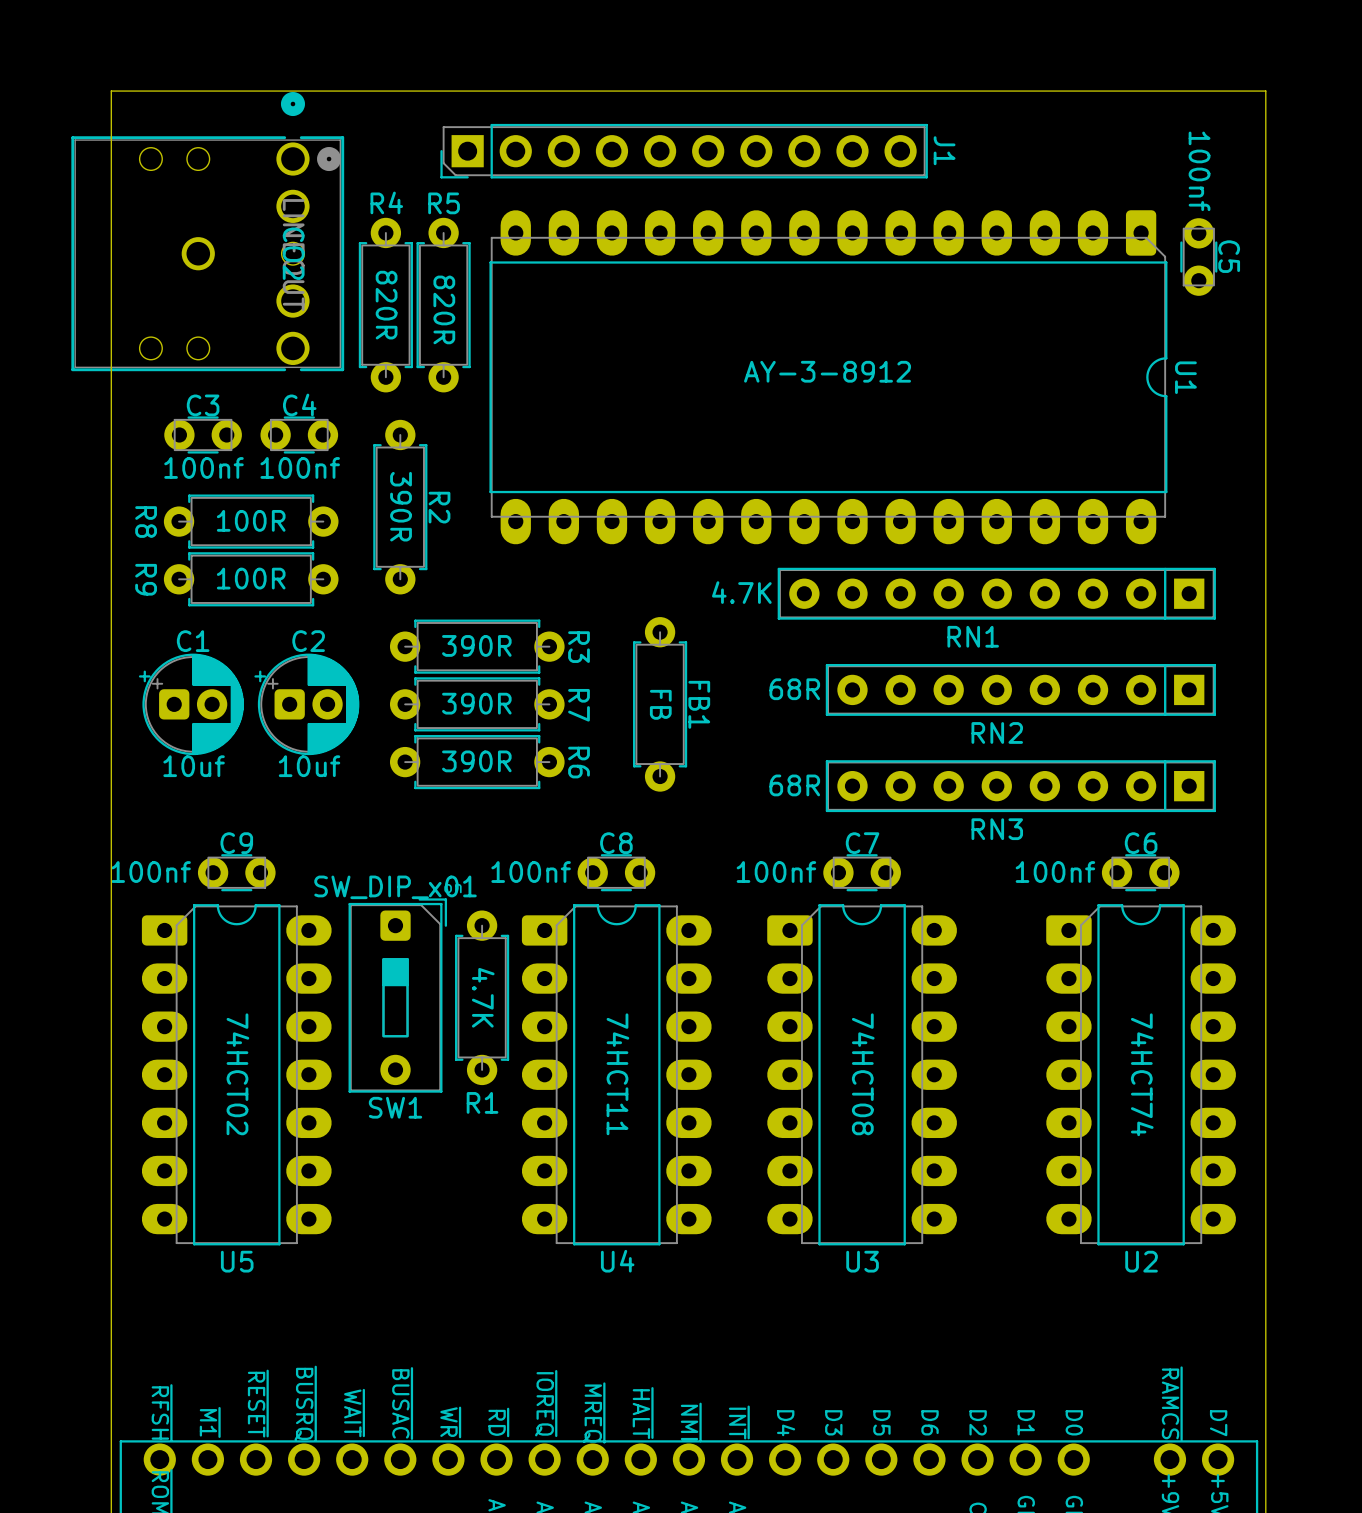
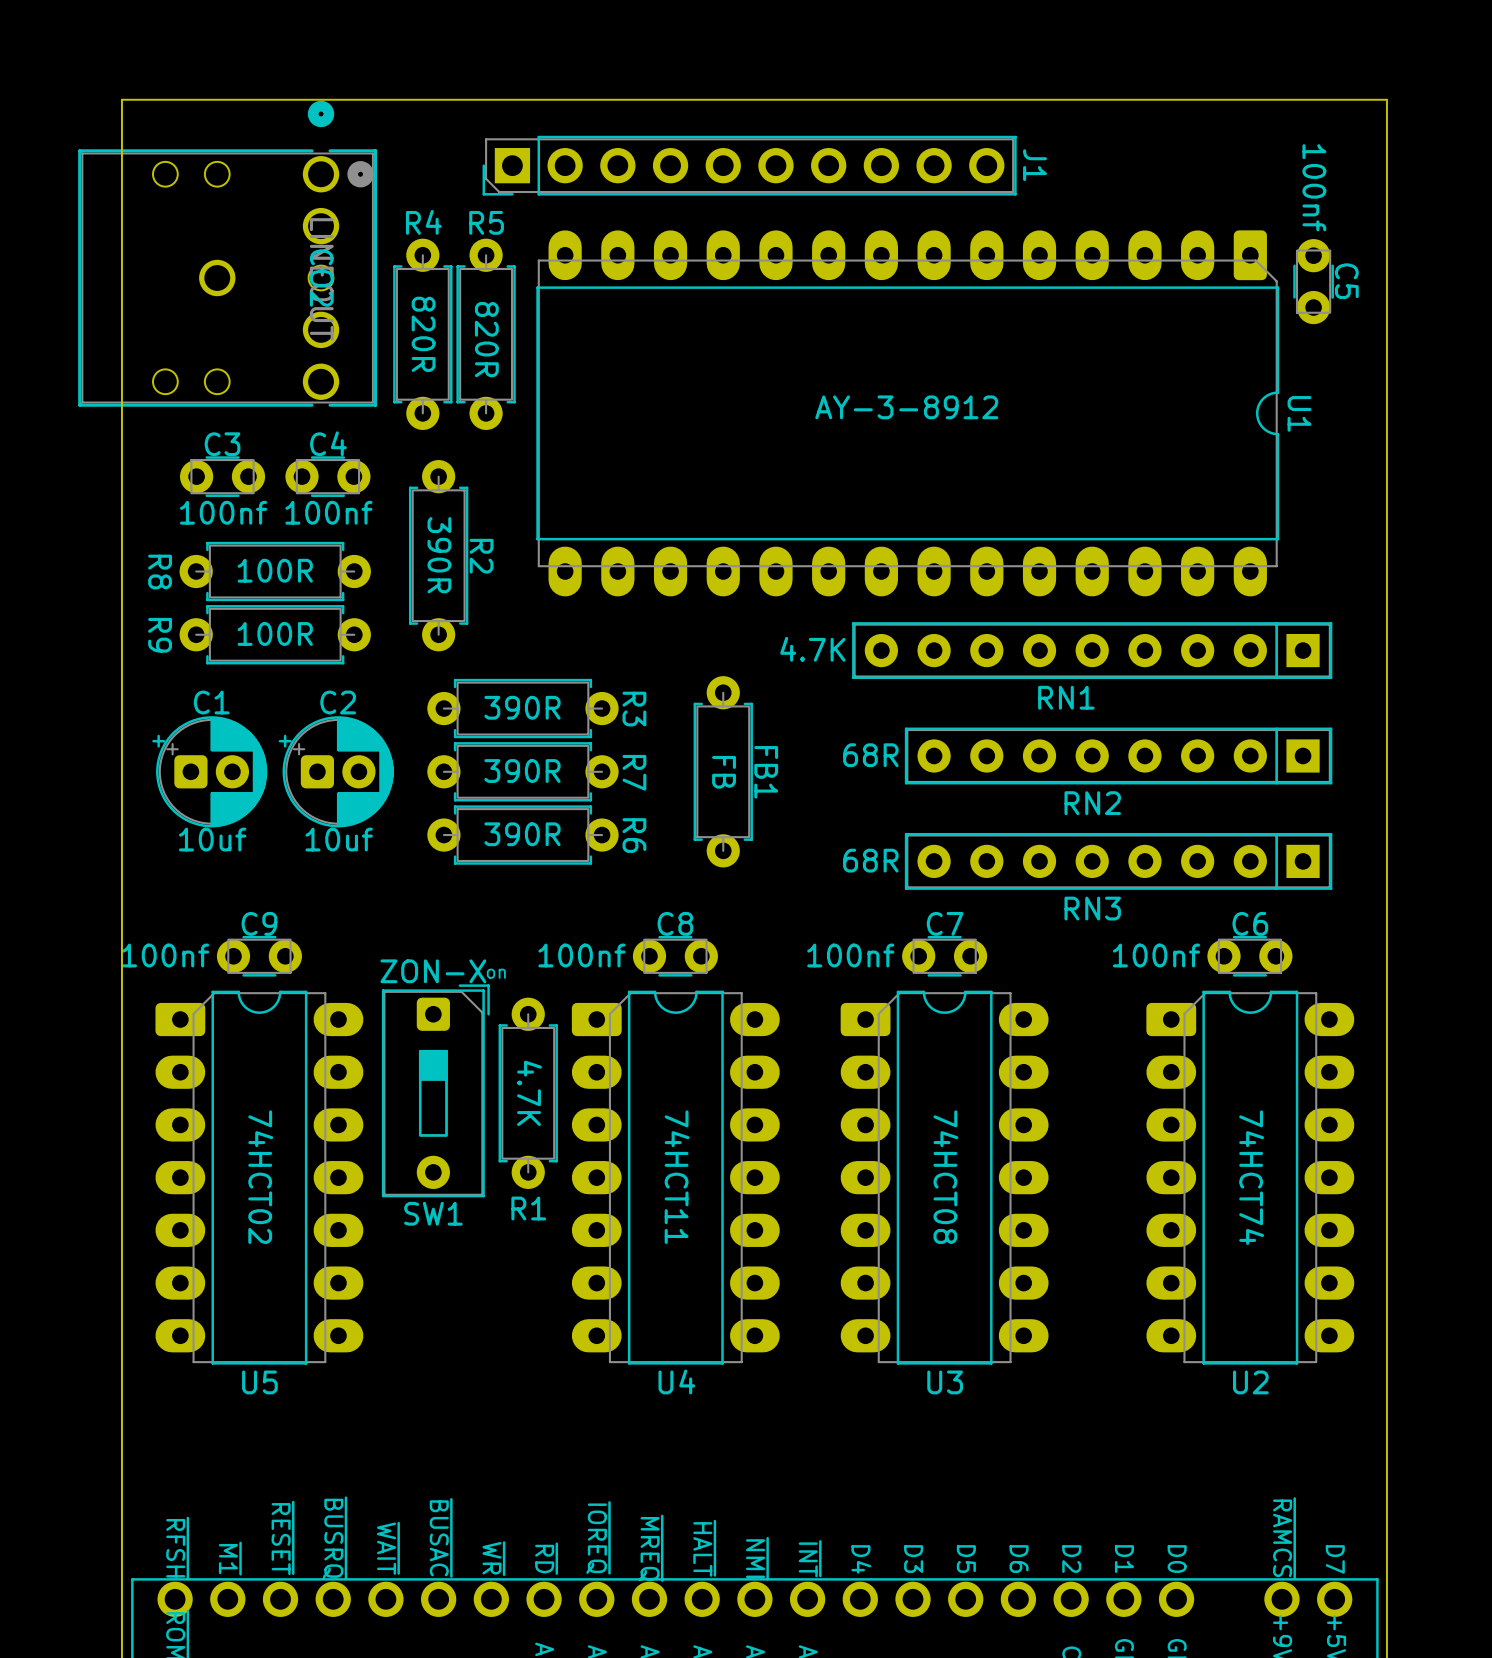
SW1 value: SW_DIP_x01 (395, 887) -> ZON-X (433, 971)

